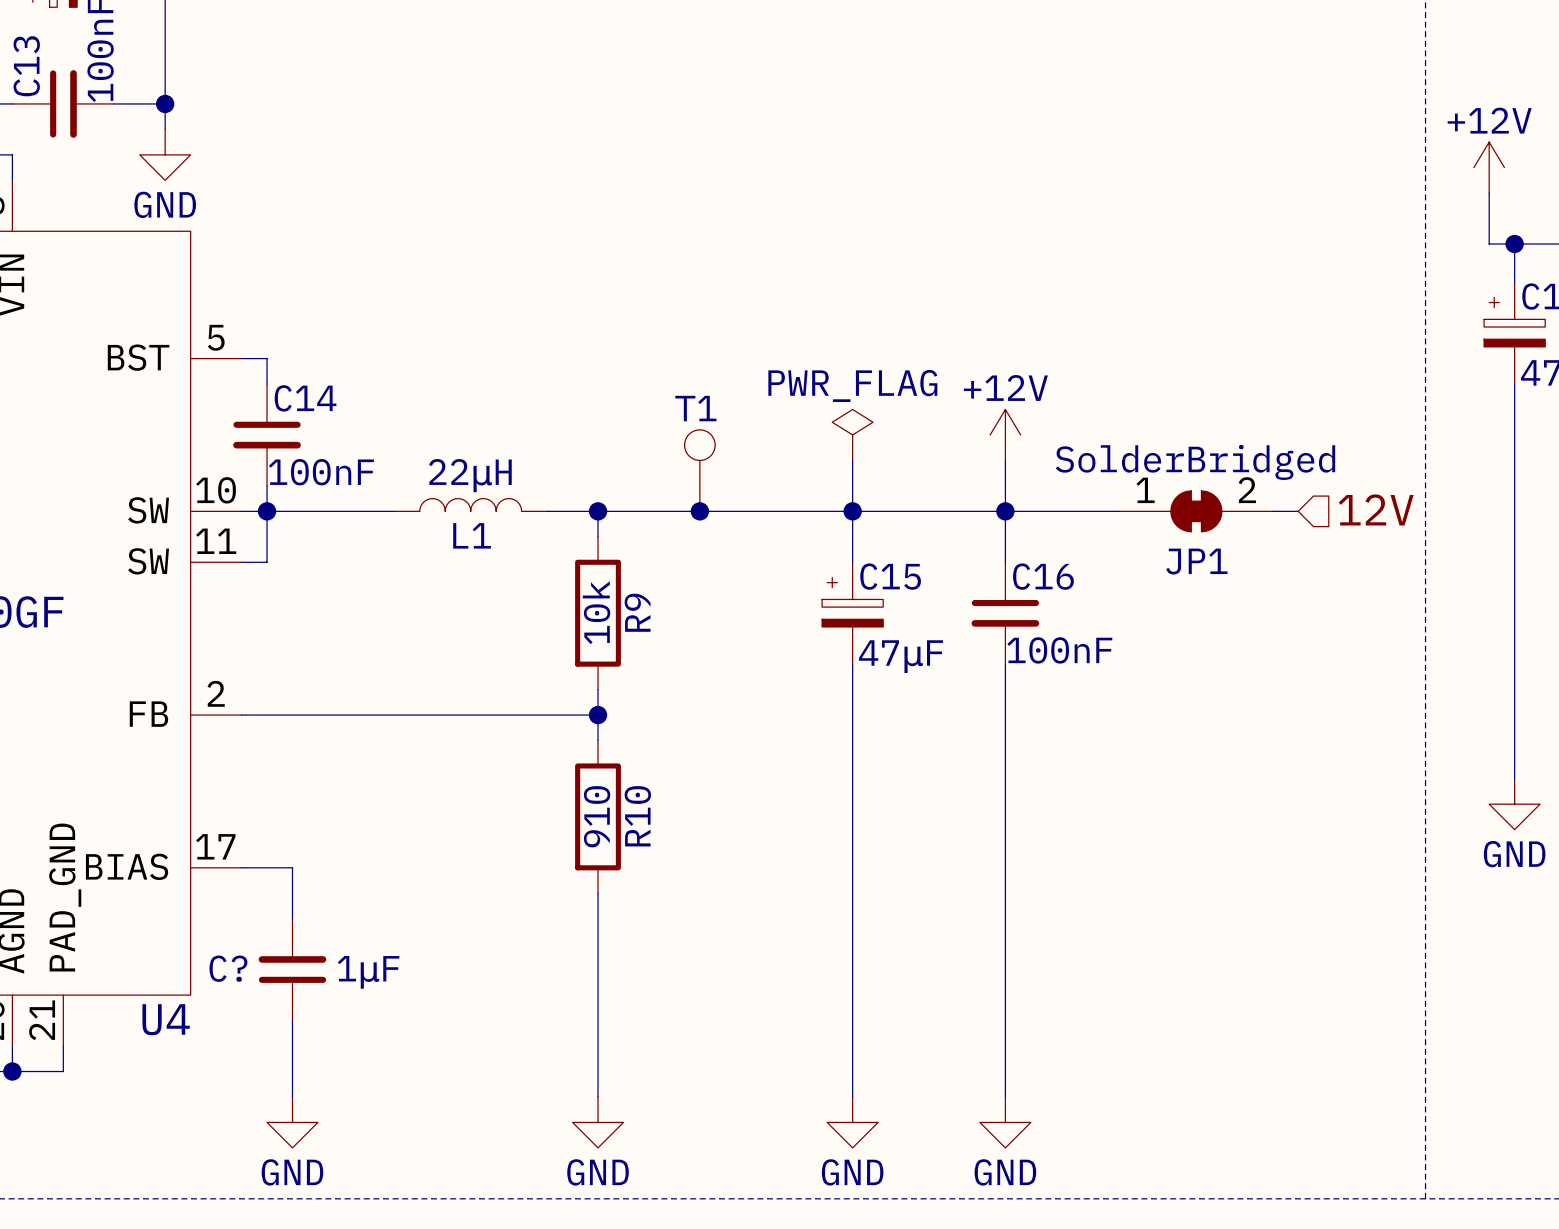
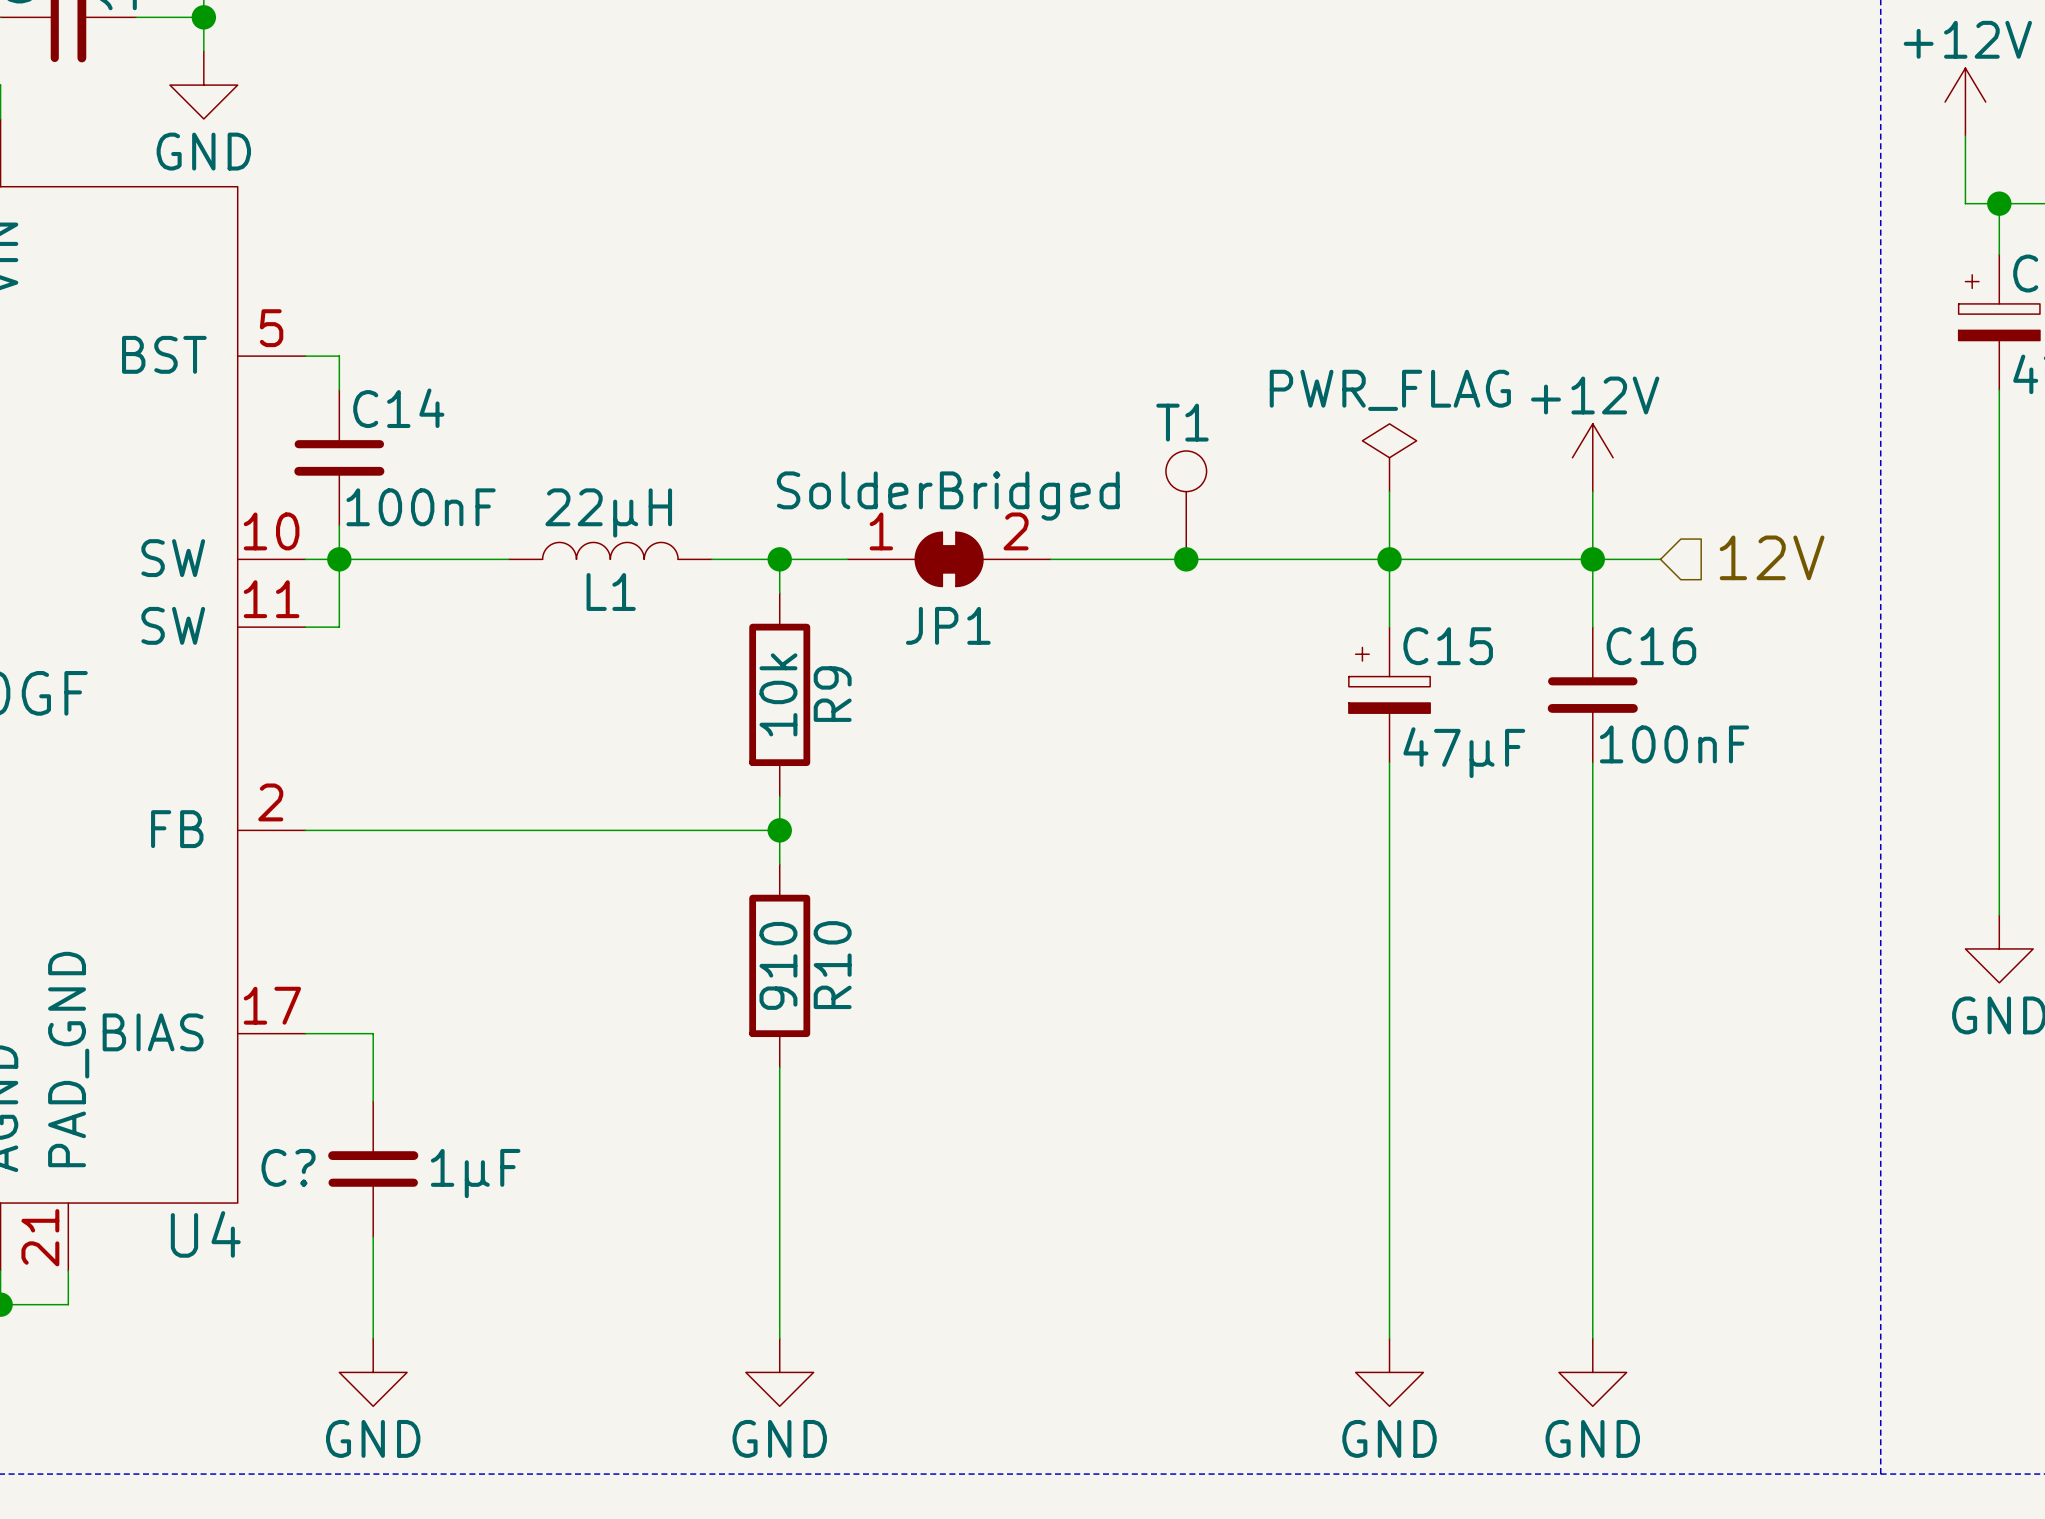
power symbol position: PWR_FLAG (852, 434) -> PWR_FLAG (1389, 457)
power symbol position: +12V (1005, 434) -> +12V (1592, 457)
wire: (852, 460) (852, 562) -> (1389, 491) (1389, 627)
wire: (1005, 460) (1005, 562) -> (1592, 491) (1592, 627)
T1 position: (699, 470) -> (1186, 505)
hierarchical label position: 12V (1376, 509) -> 12V (1772, 557)
junction: (699, 511) -> none
junction: (852, 511) -> none
junction: none -> (1186, 559)
junction: (1005, 511) -> none
junction: none -> (1389, 559)
JP1 position: (1196, 511) -> (949, 559)
junction: none -> (1592, 559)
wire: (1272, 511) (1298, 511) -> none
C15 position: (852, 613) -> (1389, 694)
C16 position: (1005, 613) -> (1592, 694)
wire: (852, 664) (852, 1096) -> (1389, 762) (1389, 1338)
wire: (1005, 664) (1005, 1096) -> (1592, 762) (1592, 1338)
power symbol: GND (852, 1122) -> none
power symbol position: GND (1005, 1122) -> GND (1389, 1372)
power symbol: none -> GND (1592, 1372)

